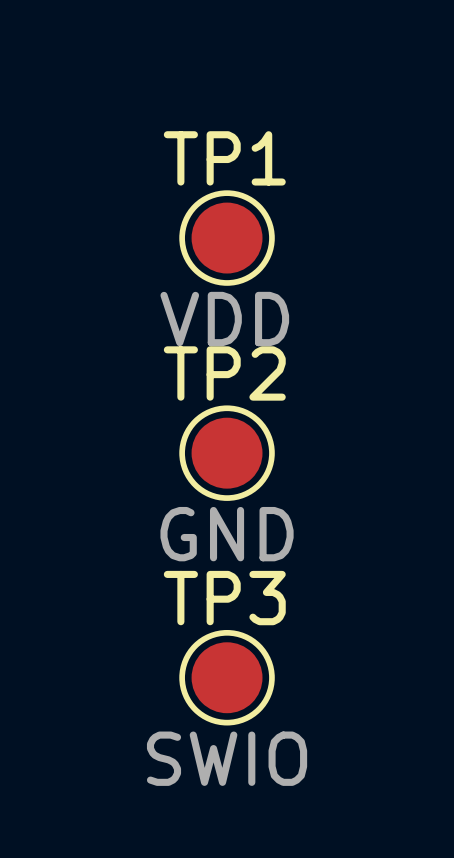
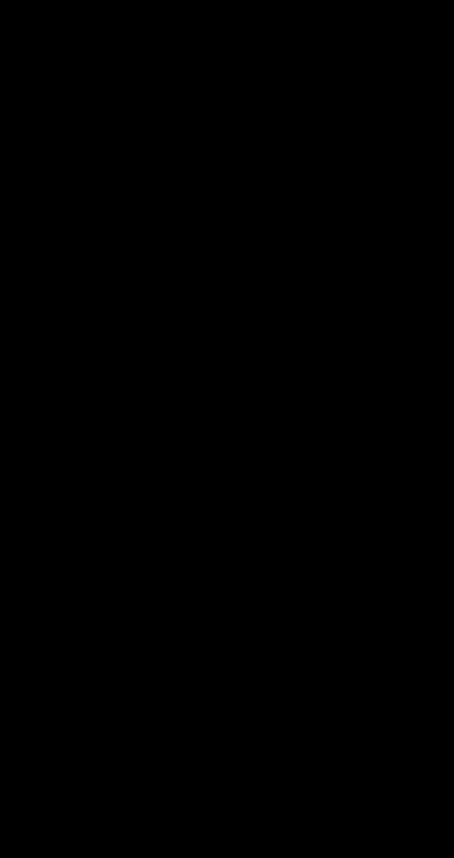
TP1: VDD (227, 238) -> none
TP2: GND (227, 453) -> none
TP3: SWIO (227, 677) -> none

